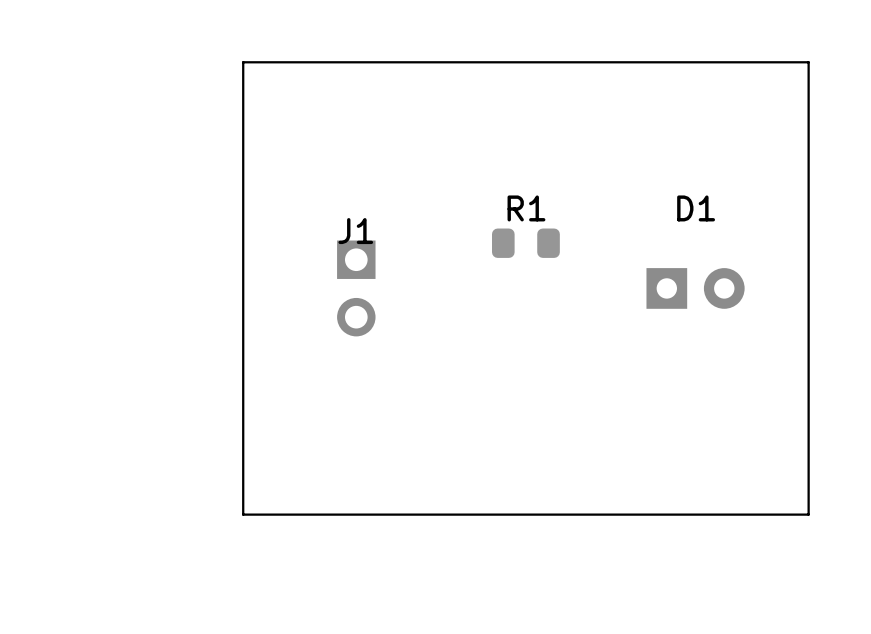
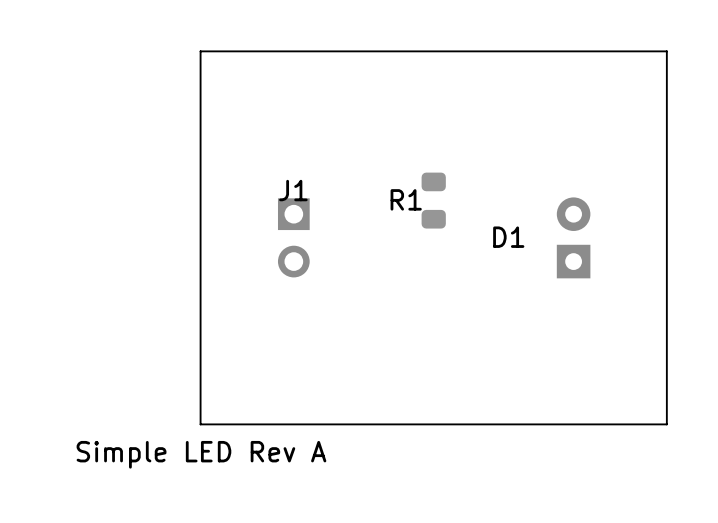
R1 name position: R1 (526, 208) -> R1 (406, 199)
R1 rotation: 0° (525, 243) -> 90° clockwise (433, 200)
D1 rotation: 0° (695, 288) -> 90° counterclockwise (573, 237)
text: none -> Simple LED Rev A (201, 454)

